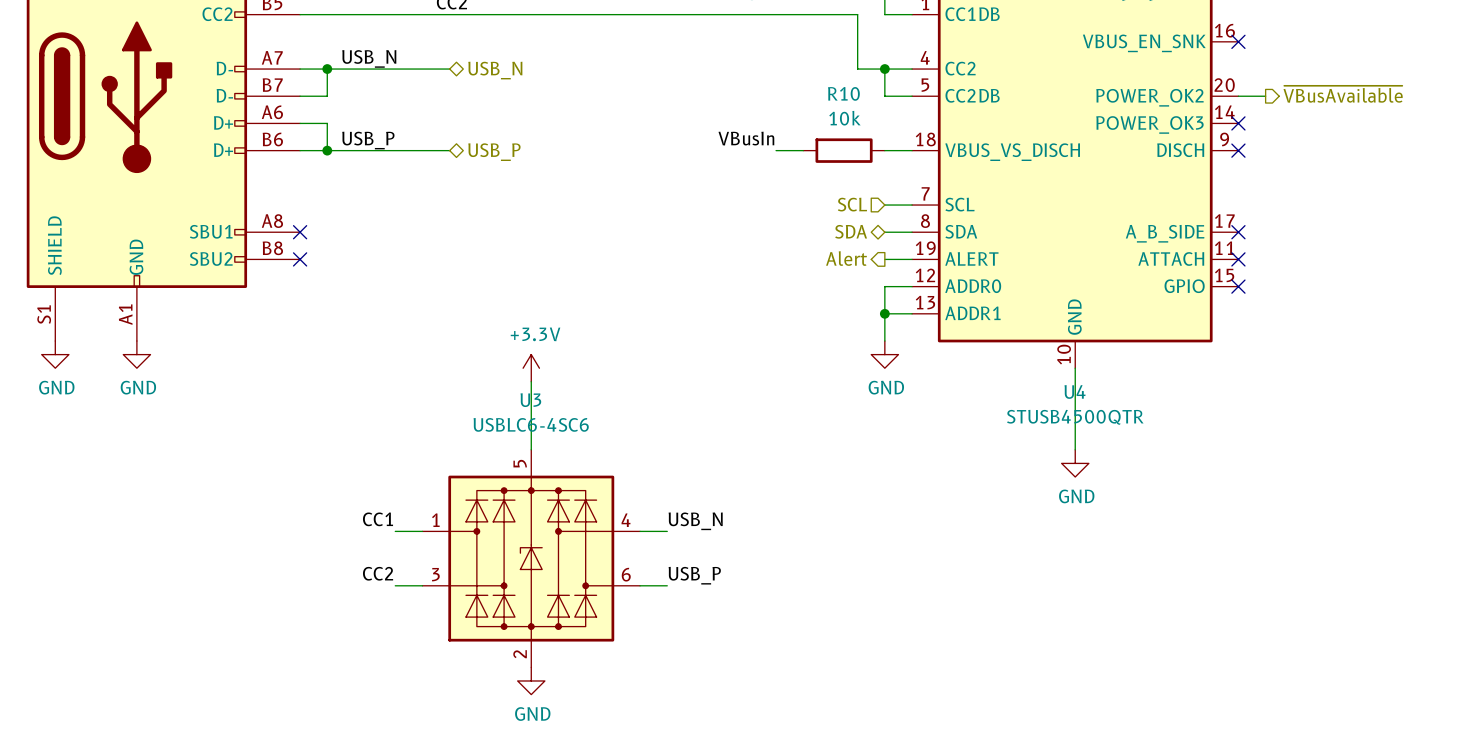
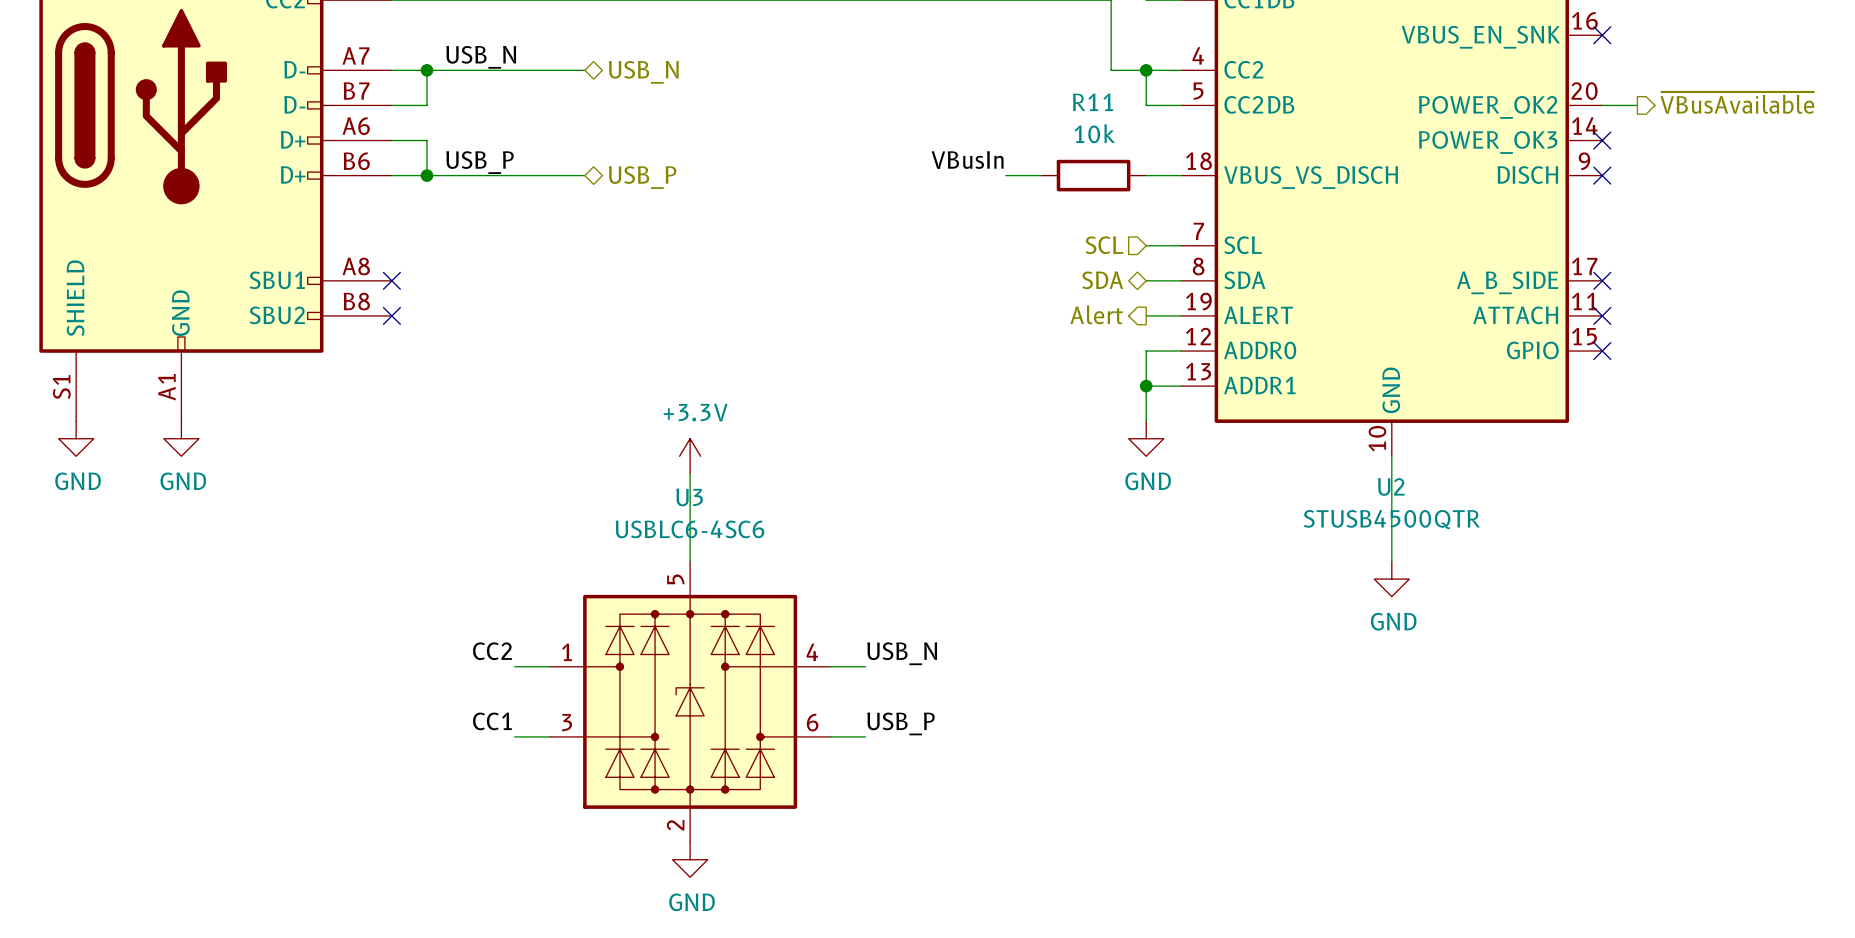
R10 name: R10 (843, 93) -> R11 (1093, 102)
U4 name: U4 (1075, 391) -> U2 (1391, 486)
label: CC1 (378, 519) -> CC2 (492, 651)
label: CC2 (378, 573) -> CC1 (492, 721)

